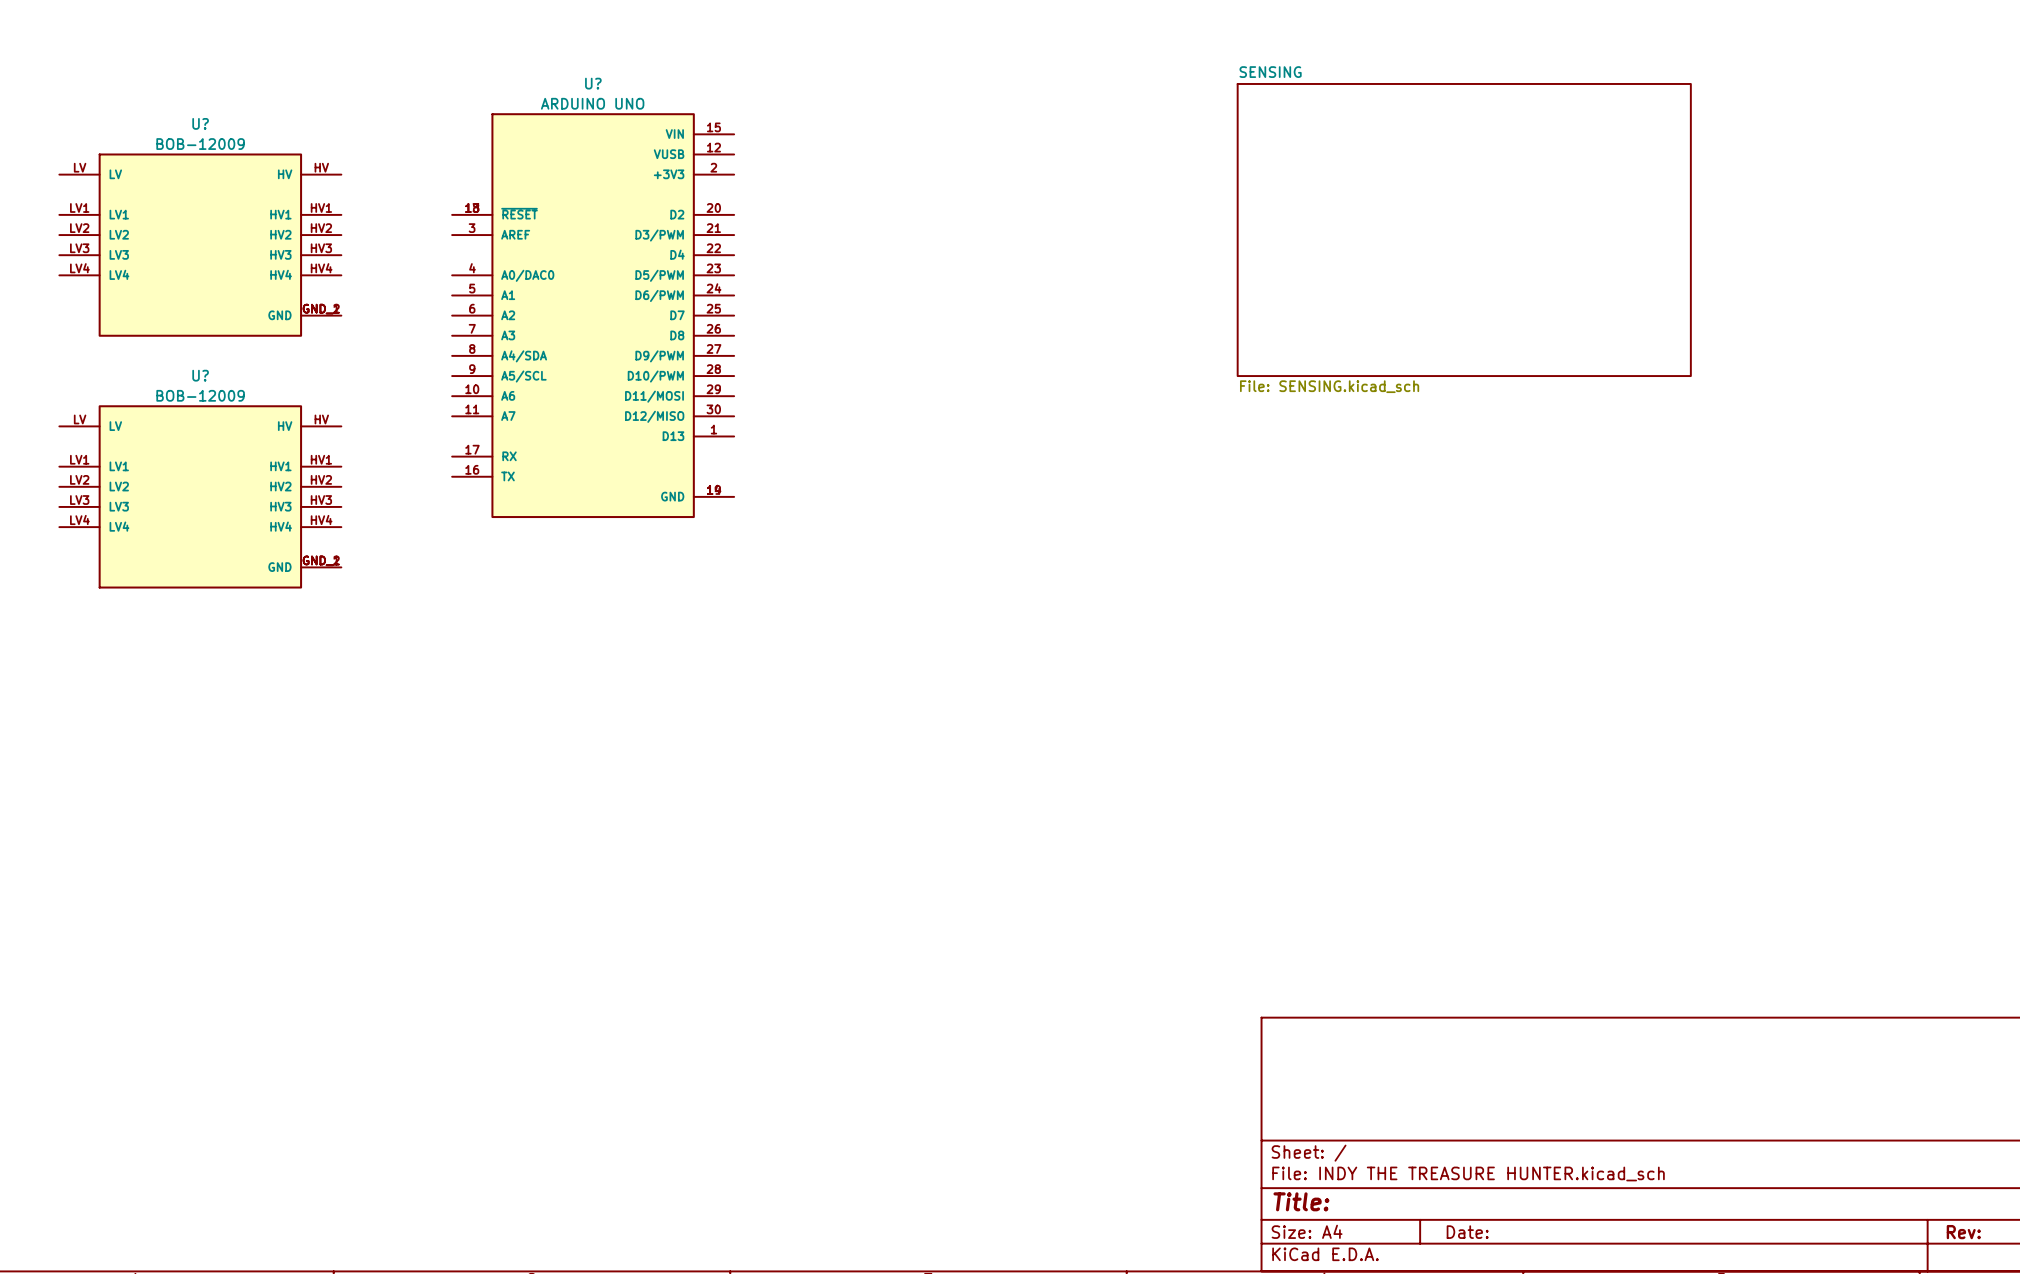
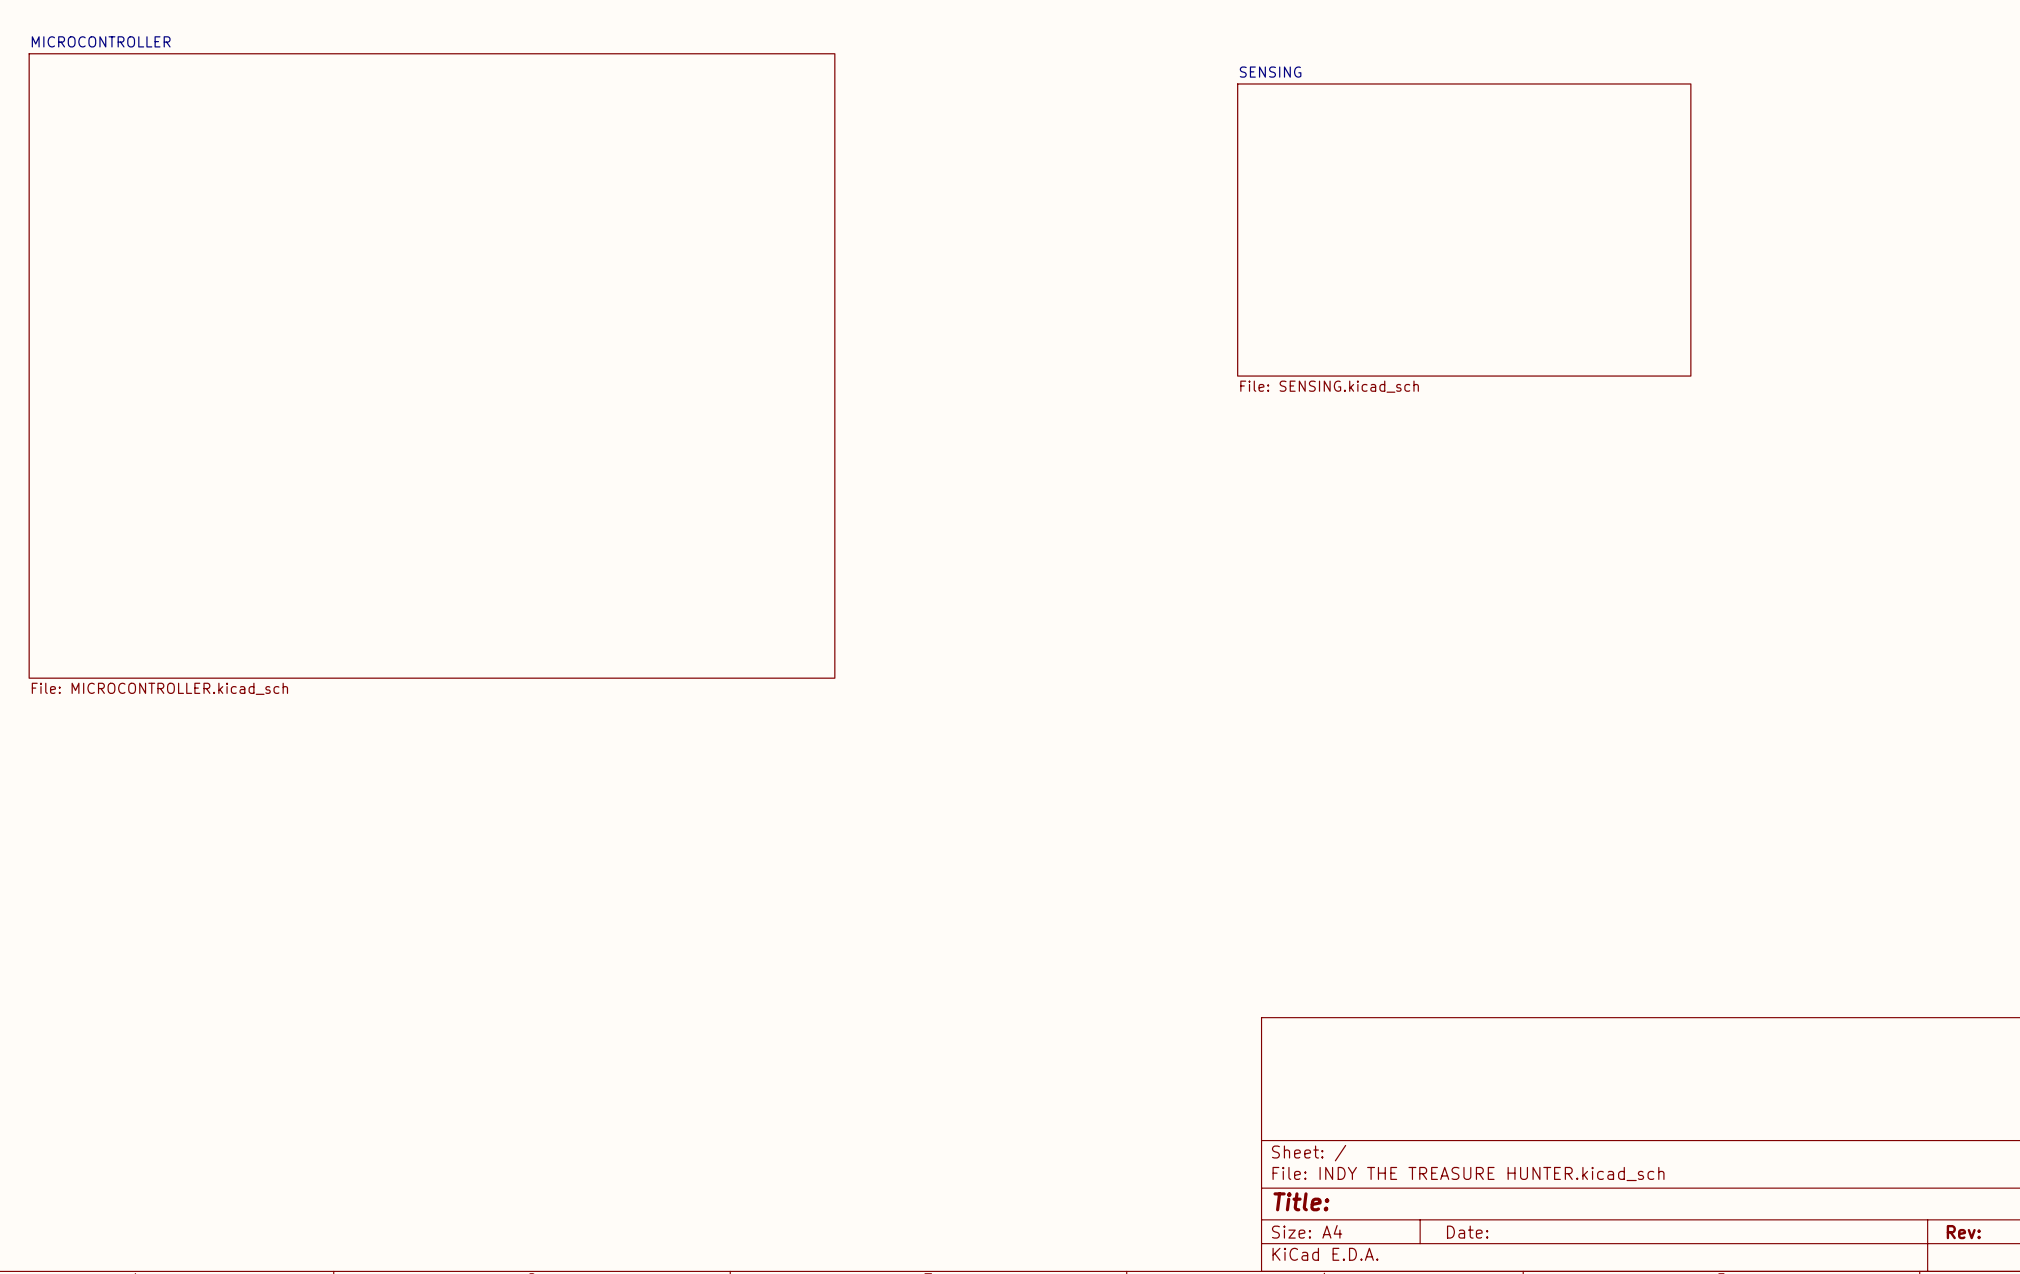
U?: BOB-12009 (200, 245) -> none
U?: ARDUINO UNO (593, 315) -> none
sheet MICROCONTROLLER: none -> File: MICROCONTROLLER.kicad_sch (431, 365)
U?: BOB-12009 (200, 496) -> none

